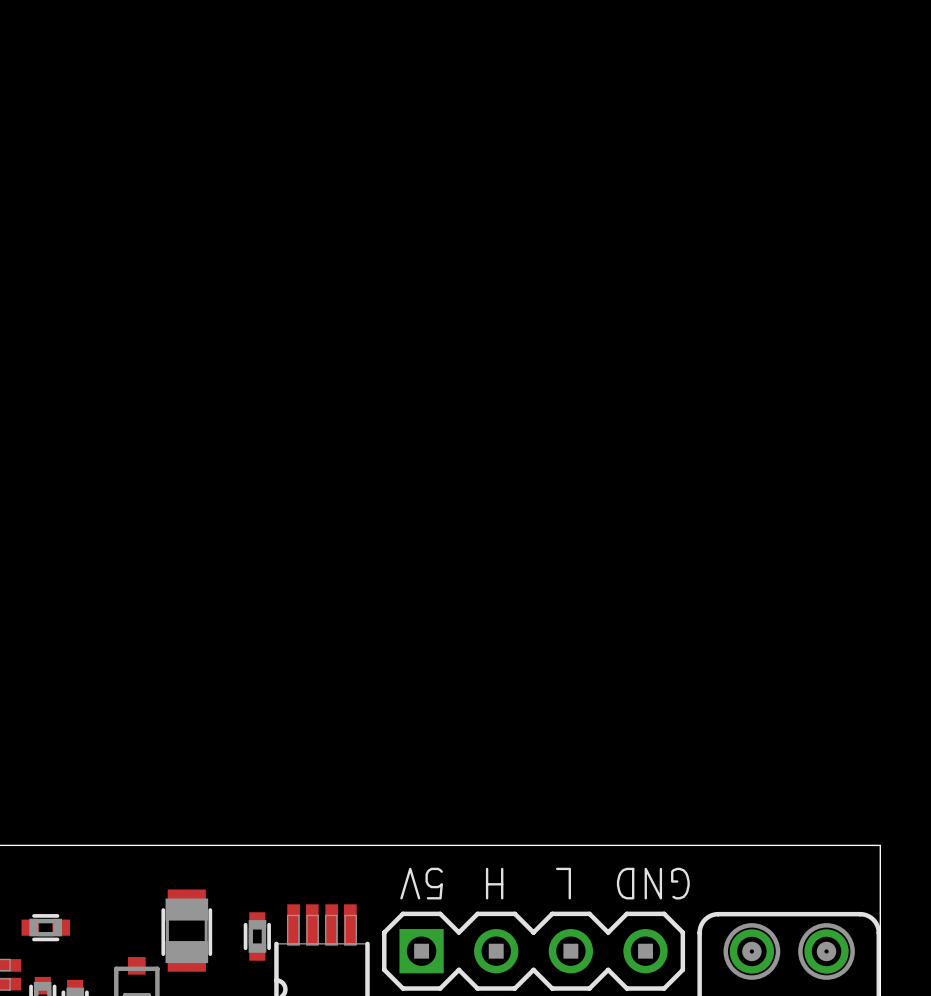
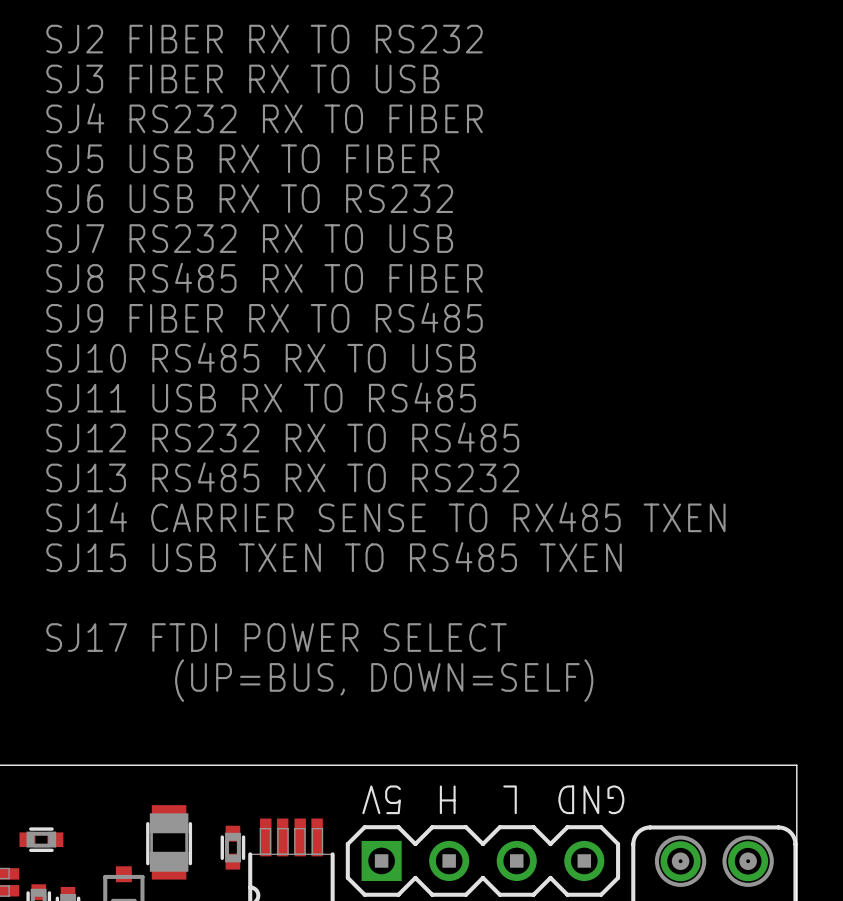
text: none -> SJ2 FIBER RX TO RS232 (264, 39)
text: none -> SJ3 FIBER RX TO USB (242, 78)
text: none -> SJ4 RS232 RX TO FIBER (264, 118)
text: none -> SJ5 USB RX TO FIBER (242, 158)
text: none -> SJ6 USB RX TO RS232 (249, 198)
text: none -> SJ7 RS232 RX TO USB (249, 238)
text: none -> SJ8 RS485 RX TO FIBER (264, 277)
text: none -> SJ9 FIBER RX TO RS485 (264, 317)
text: none -> SJ10 RS485 RX TO USB (261, 357)
text: none -> SJ11 USB RX TO RS485 (261, 397)
text: none -> SJ12 RS232 RX TO RS485 (282, 437)
text: none -> SJ13 RS485 RX TO RS232 (282, 477)
text: none -> SJ14 CARRIER SENSE TO RX485 TXEN (385, 517)
text: none -> SJ15 USB TXEN TO RS485 TXEN (334, 557)
text: none -> SJ17 FTDI POWER SELECT (276, 637)
text: none -> (UP=BUS, DOWN=SELF) (384, 680)

